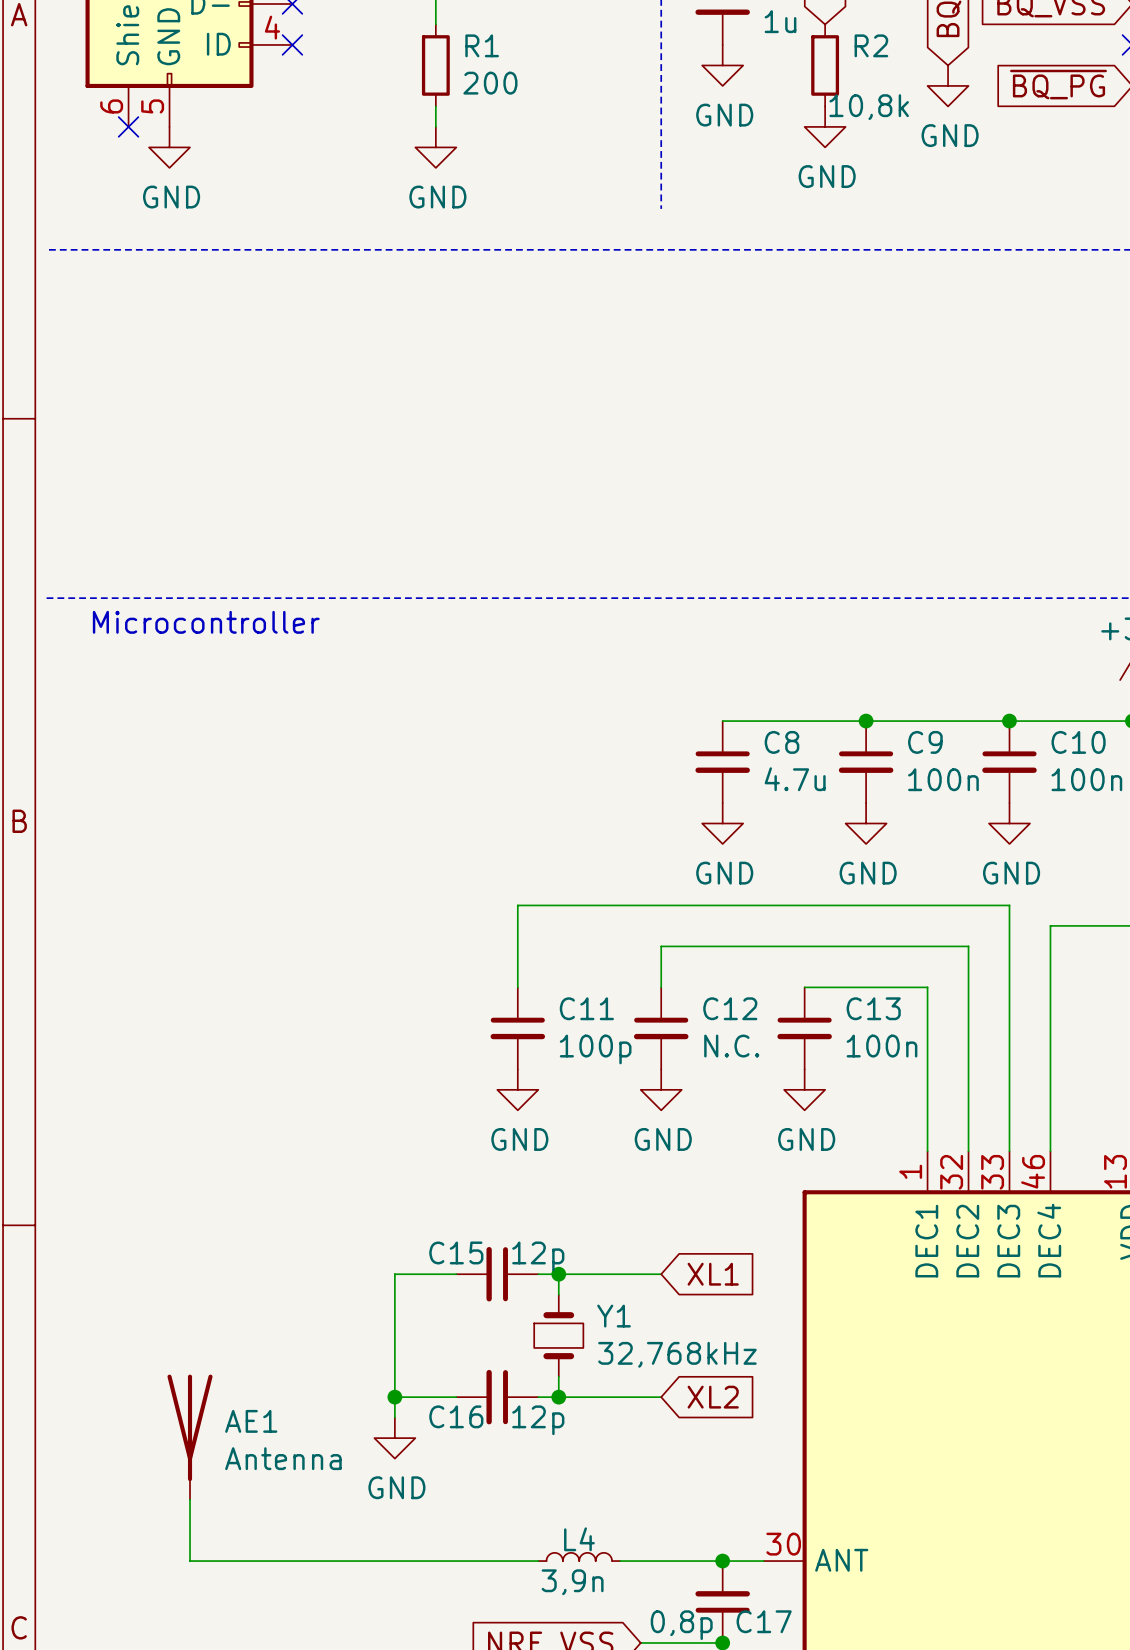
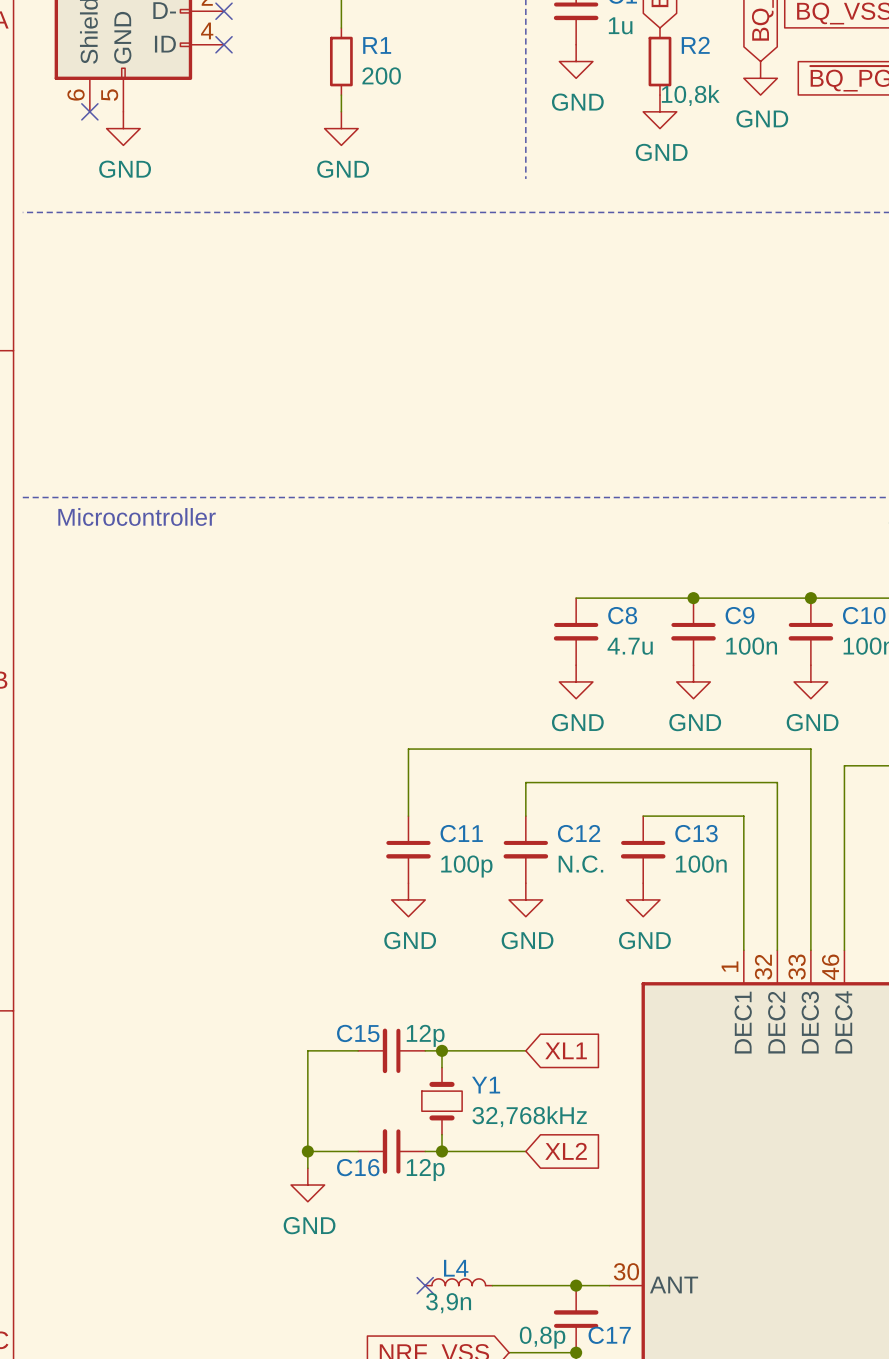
AE1: Antenna (190, 1437) -> none
wire: (190, 1499) (190, 1561) (538, 1561) -> none
no-connect mark: none -> (425, 1285)

